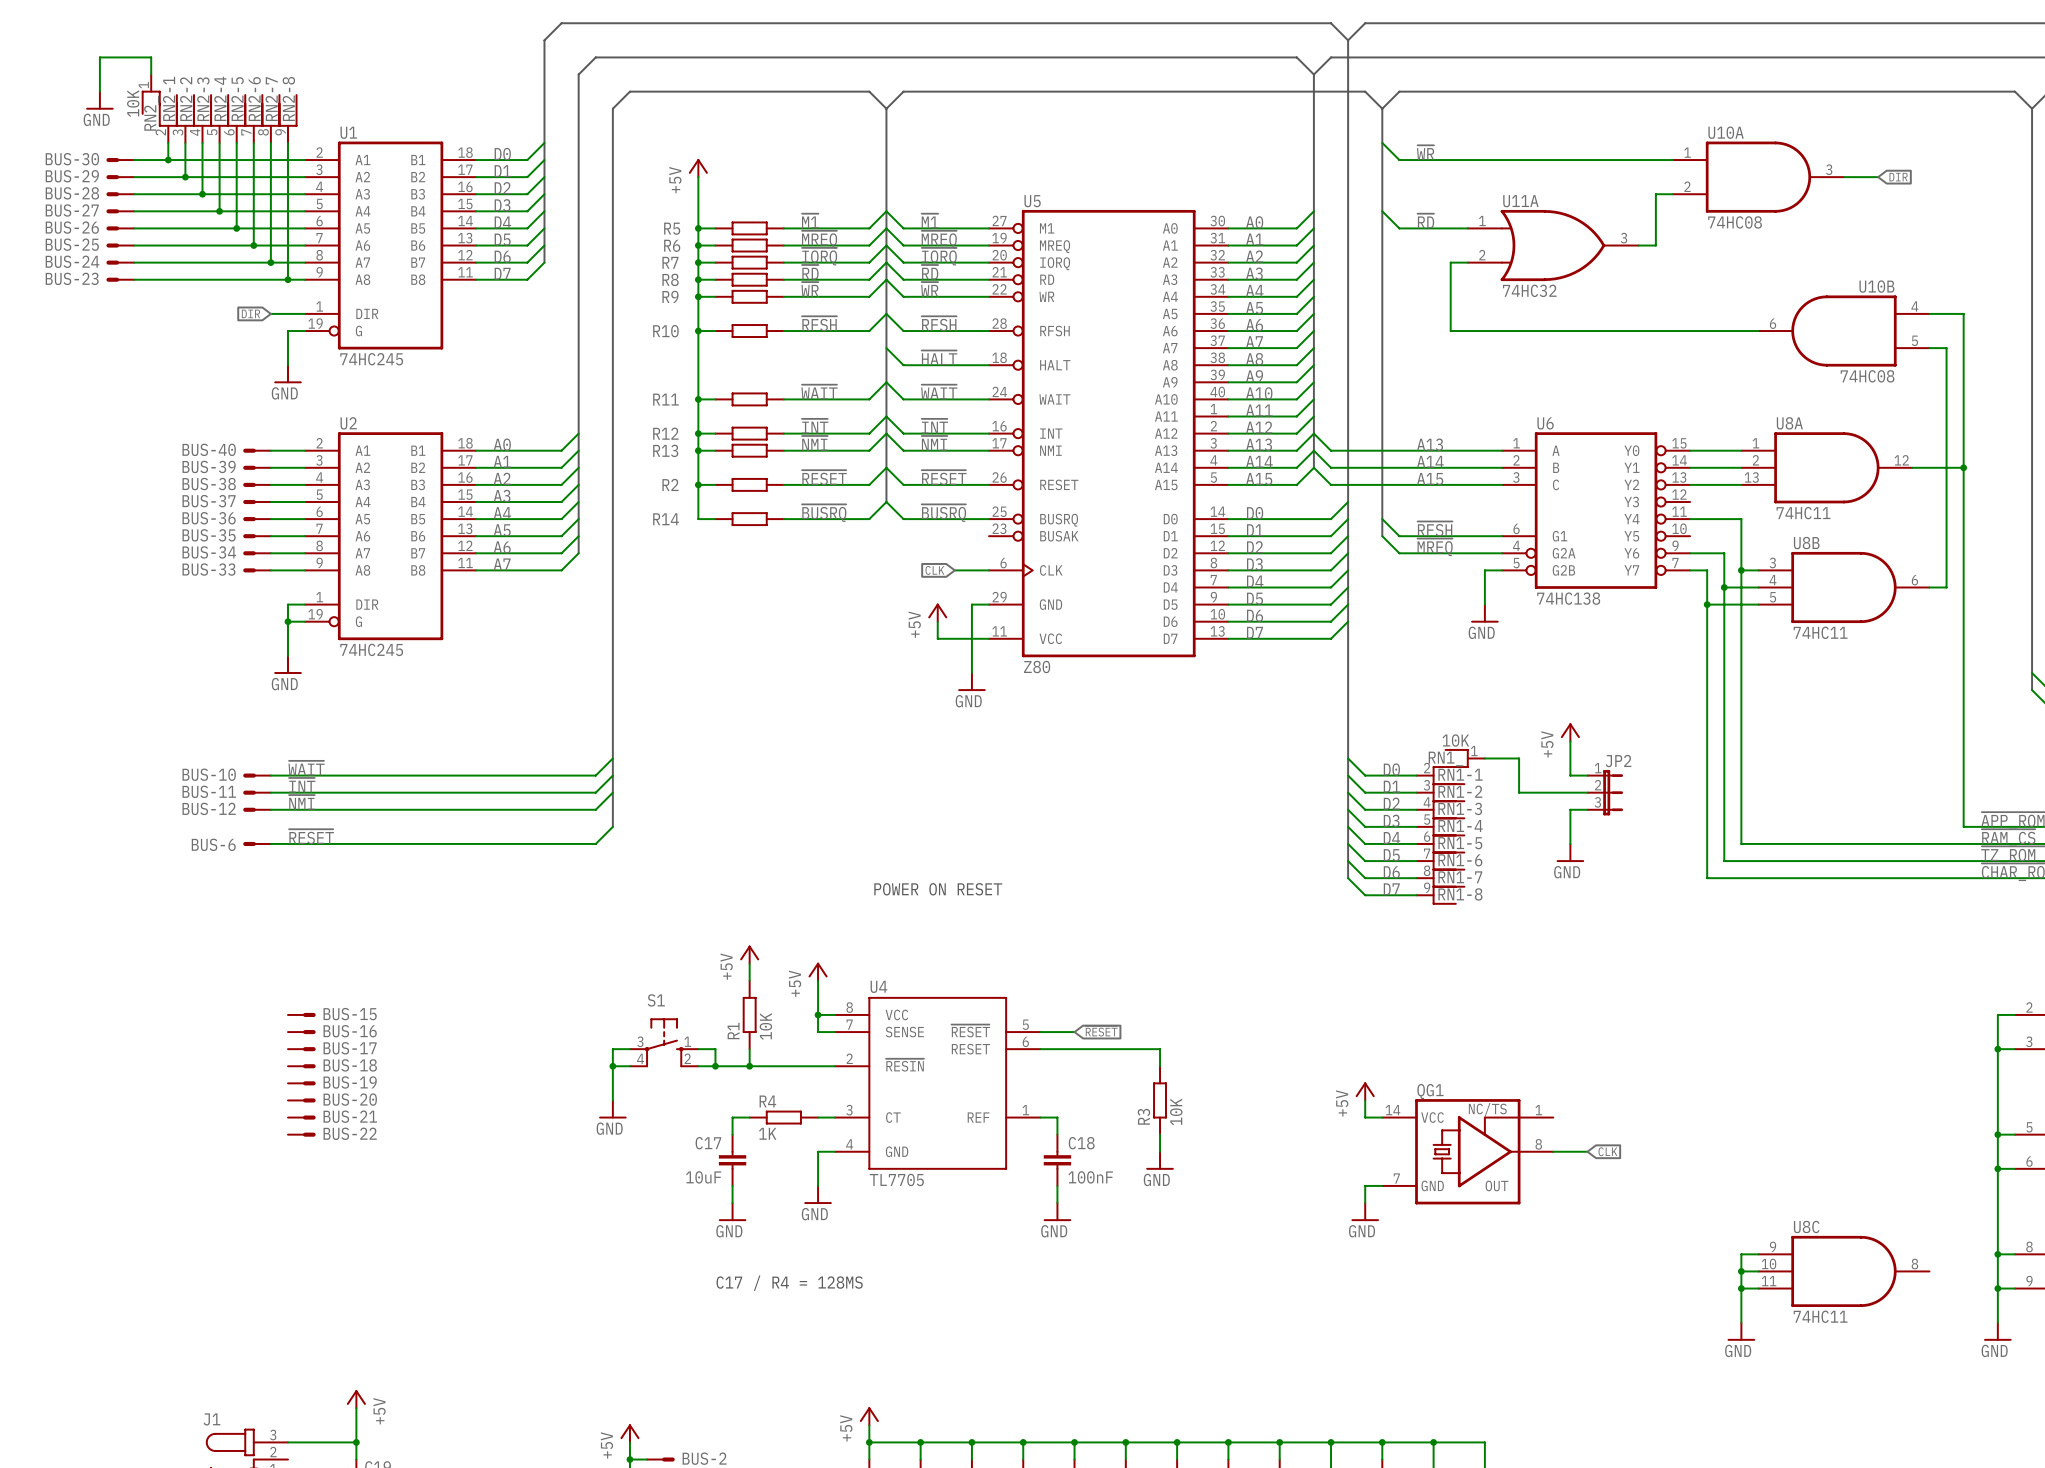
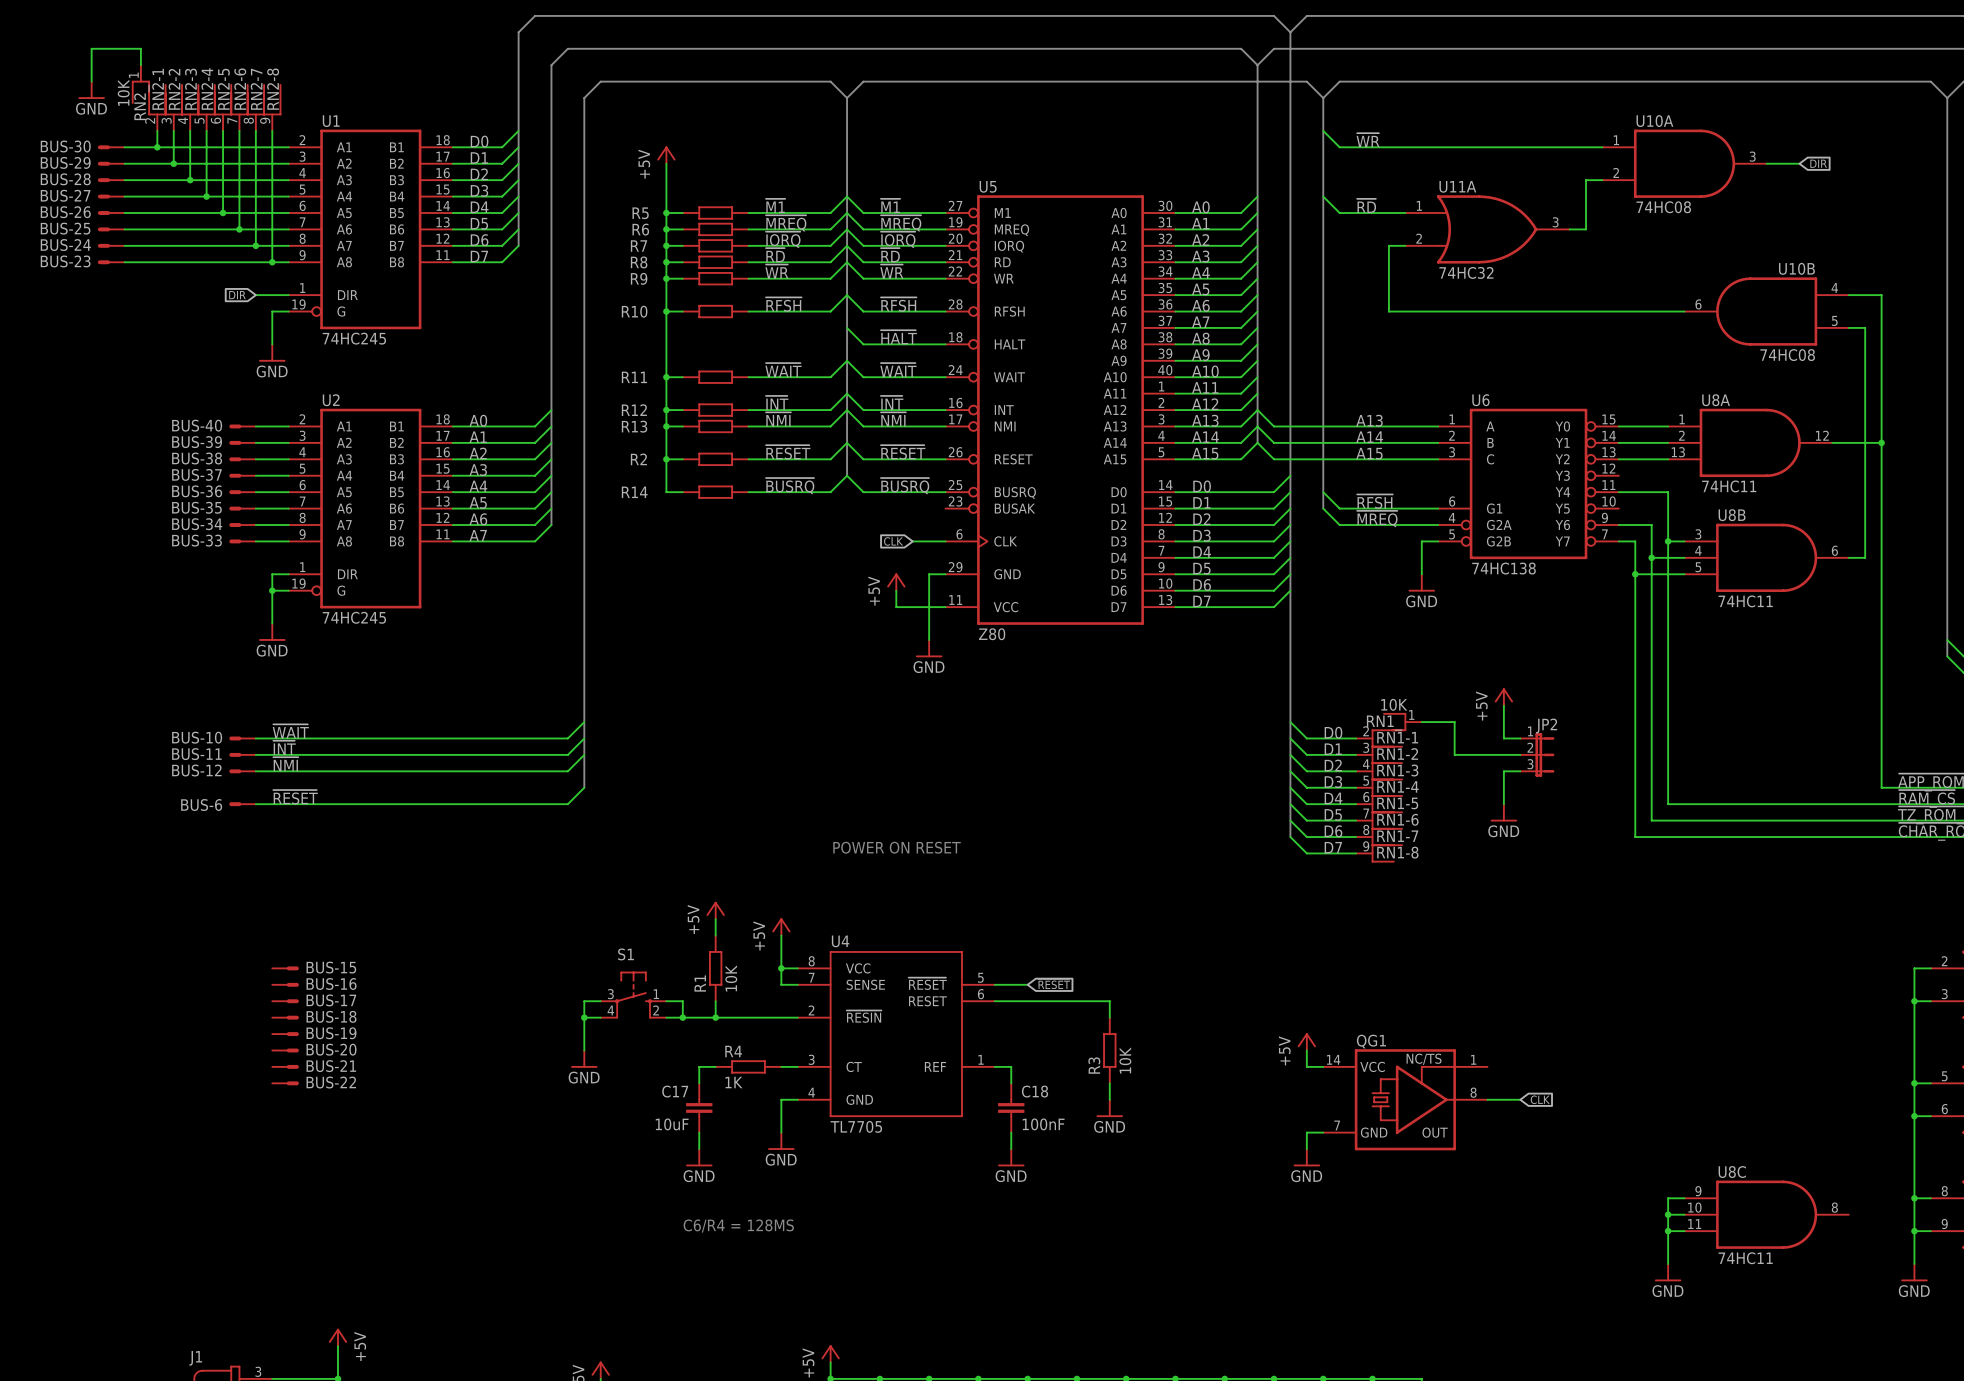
text: C17 / R4 = 128MS (789, 1283) -> C6/R4 = 128MS (738, 1226)

